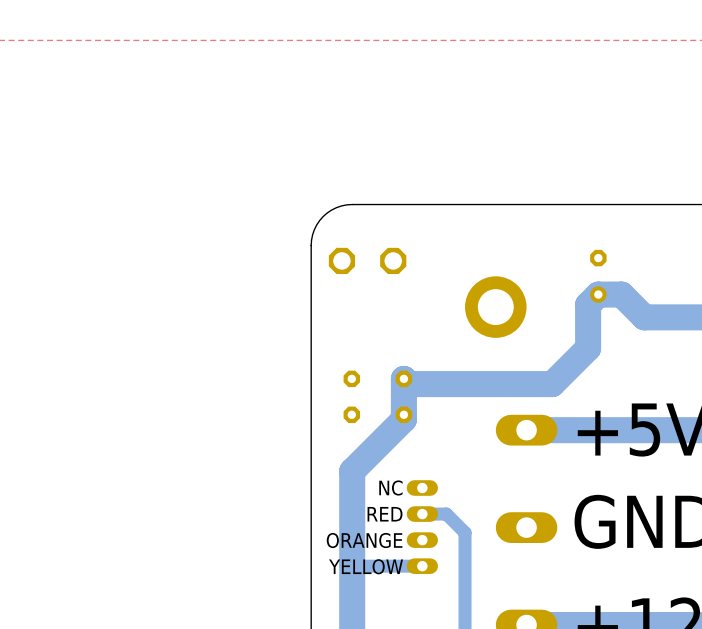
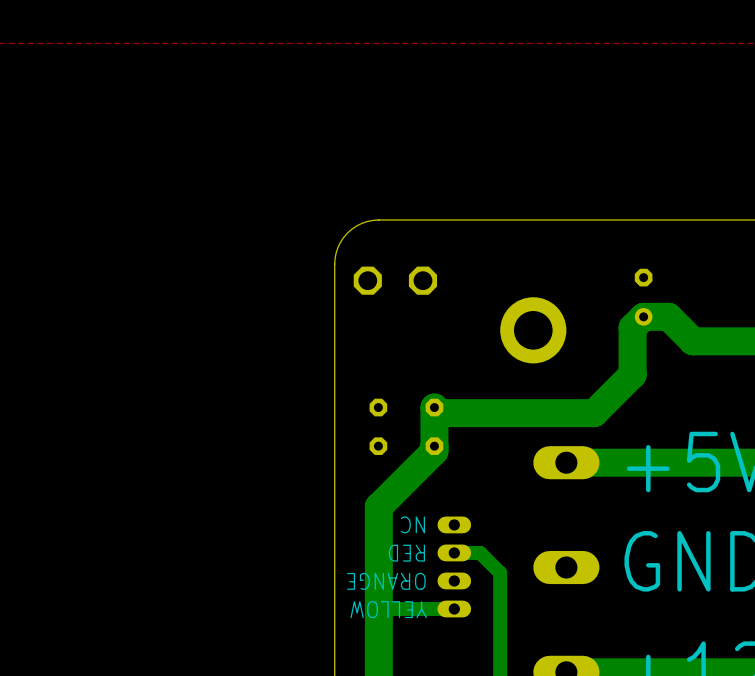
text rotation: 0° (390, 487) -> 180° (412, 524)
text rotation: 0° (385, 514) -> 180° (406, 553)
text rotation: 0° (364, 540) -> 180° (386, 581)
text rotation: 0° (366, 566) -> 180° (388, 609)

